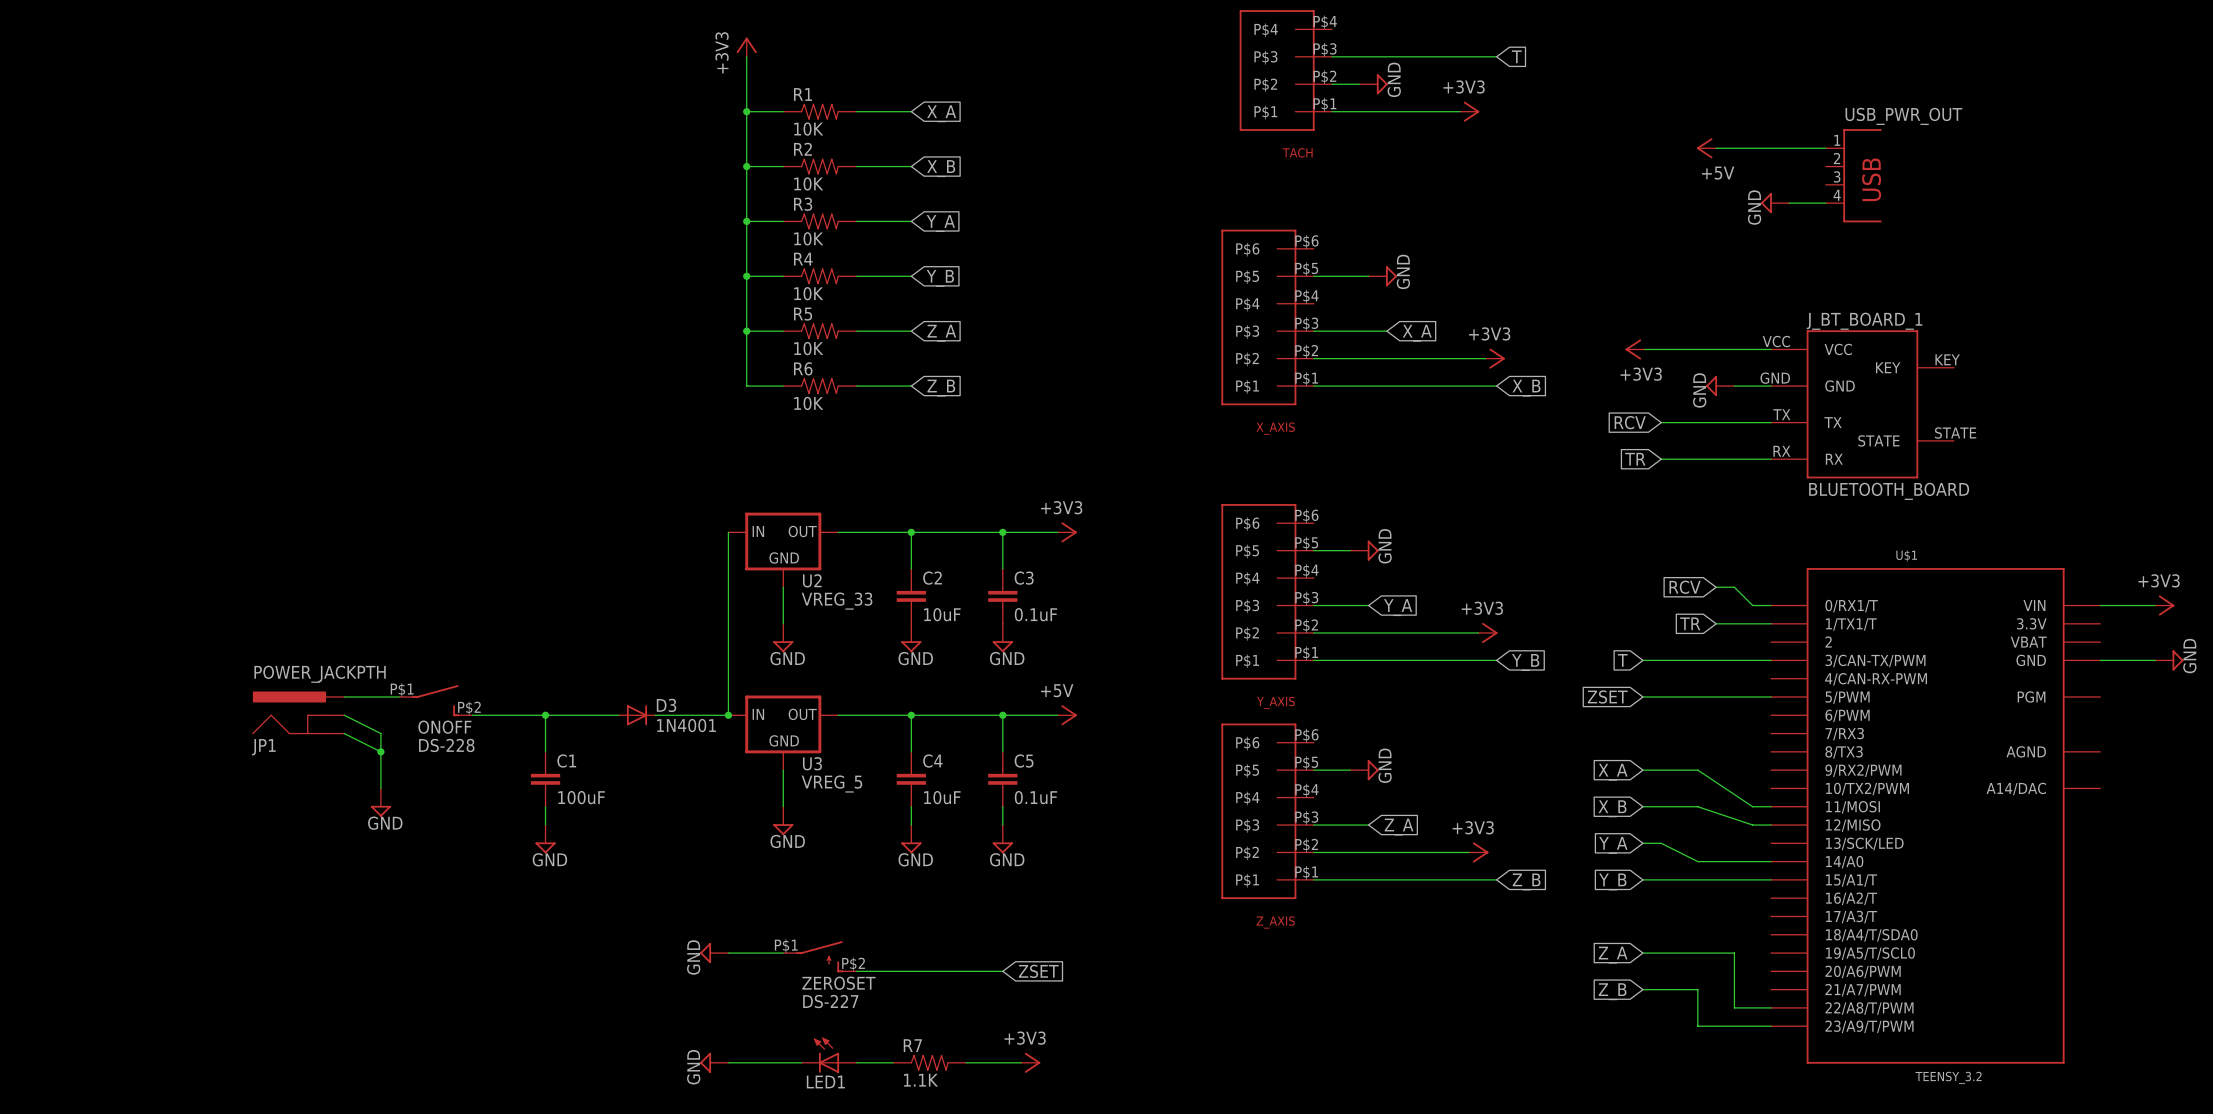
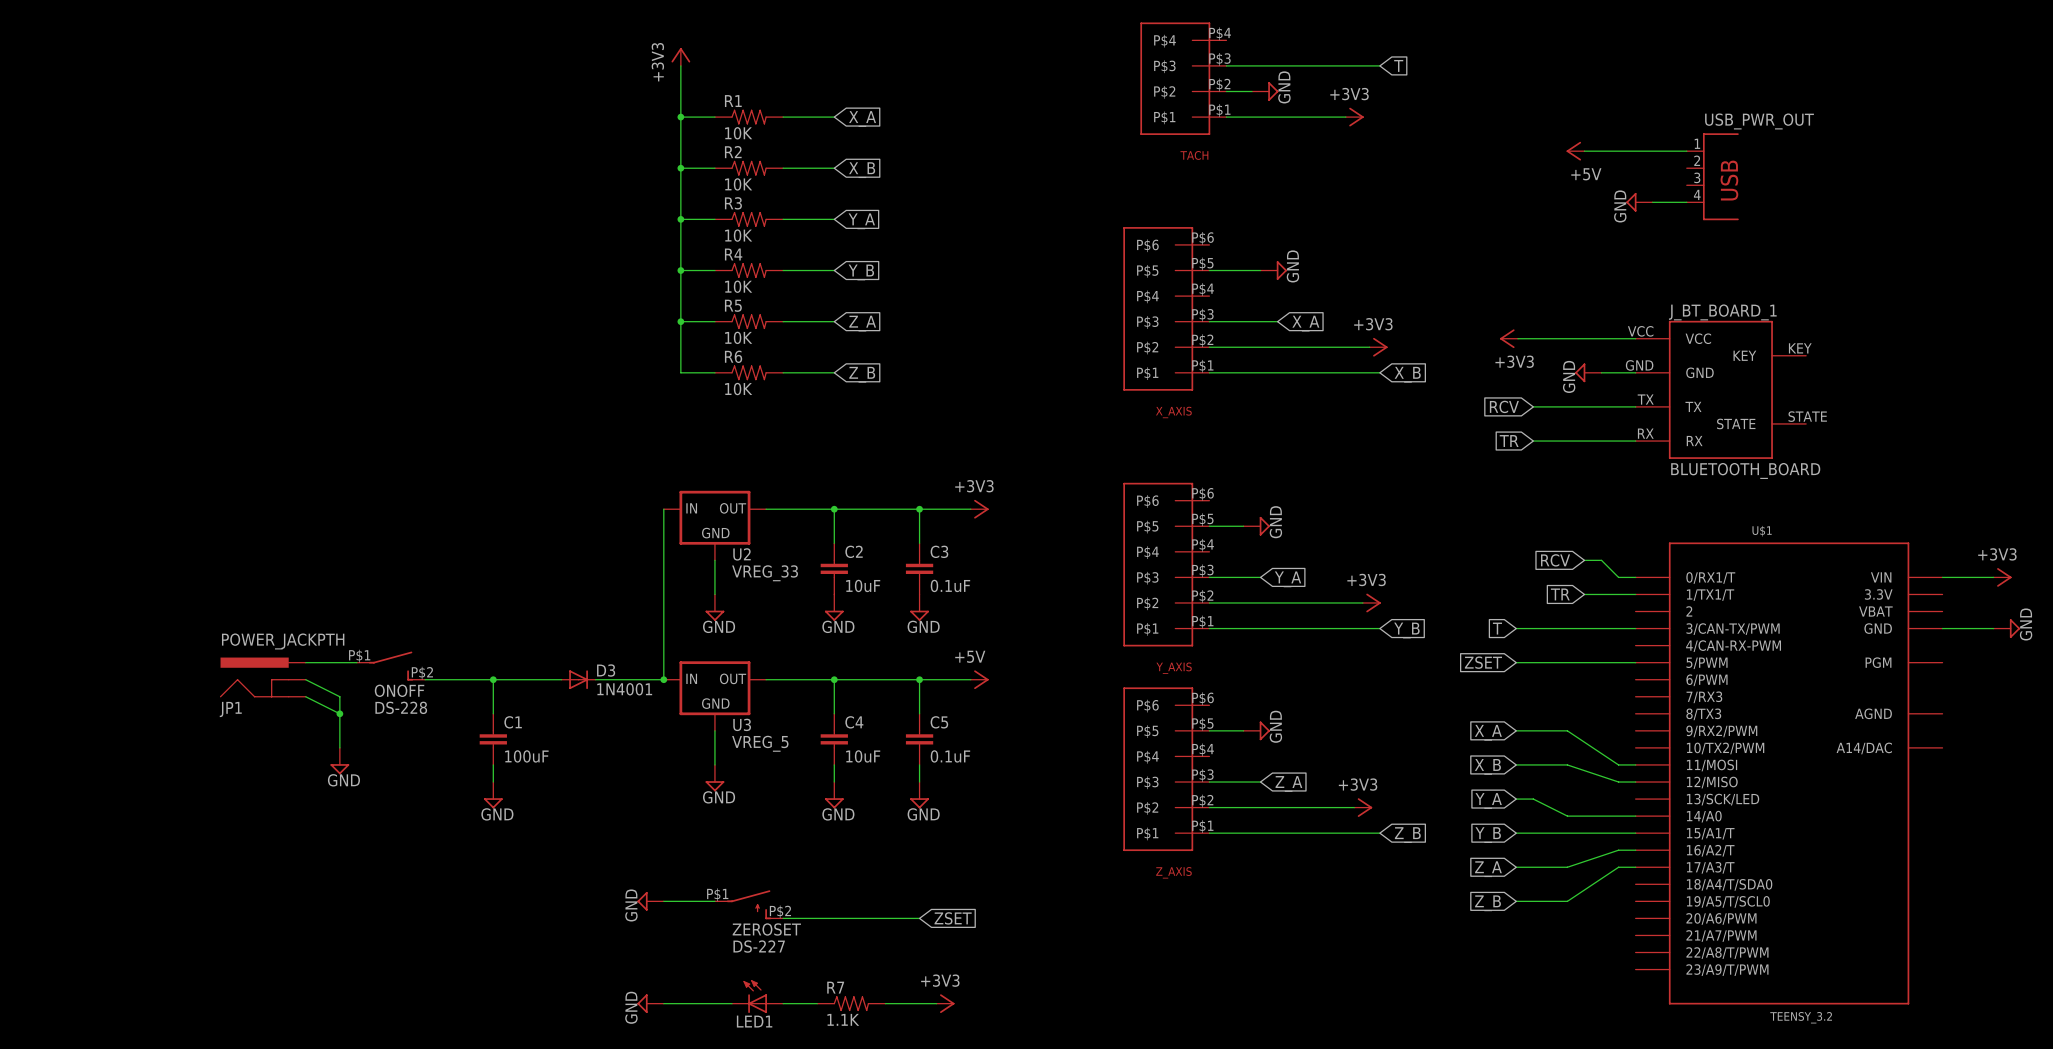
wire: none -> (1635, 850) (1618, 850) (1567, 867) (1516, 867)
global label: none -> Z_A (1488, 869)
wire: (1697, 953) (1734, 953) (1734, 1007) (1771, 1007) -> (1567, 901) (1618, 867) (1635, 867)
global label: Z_A (1613, 955) -> Z_B (1487, 903)
wire: (1642, 989) (1697, 989) (1697, 1026) (1771, 1026) -> none
global label: Z_B (1612, 991) -> none

